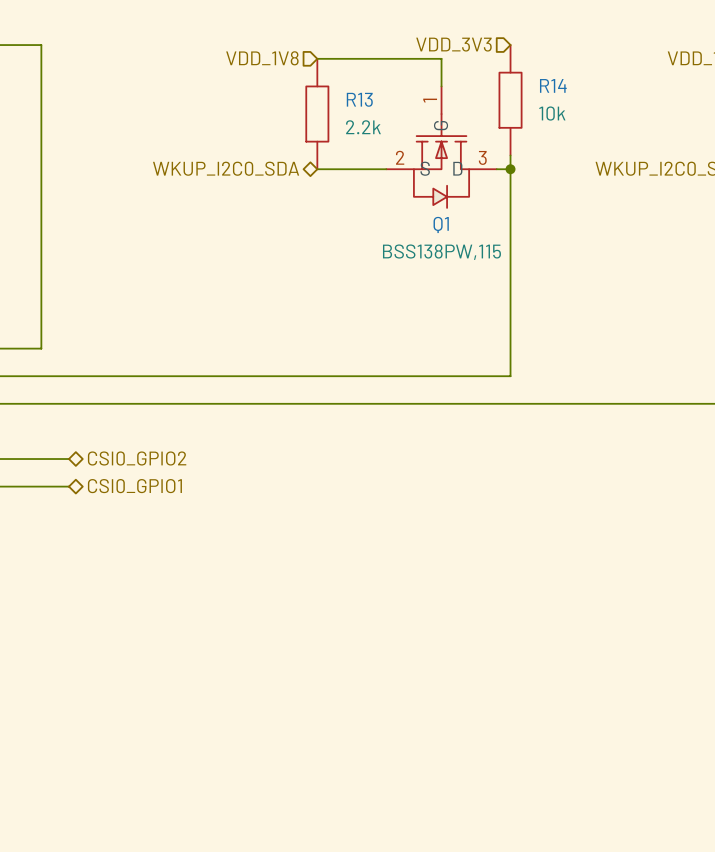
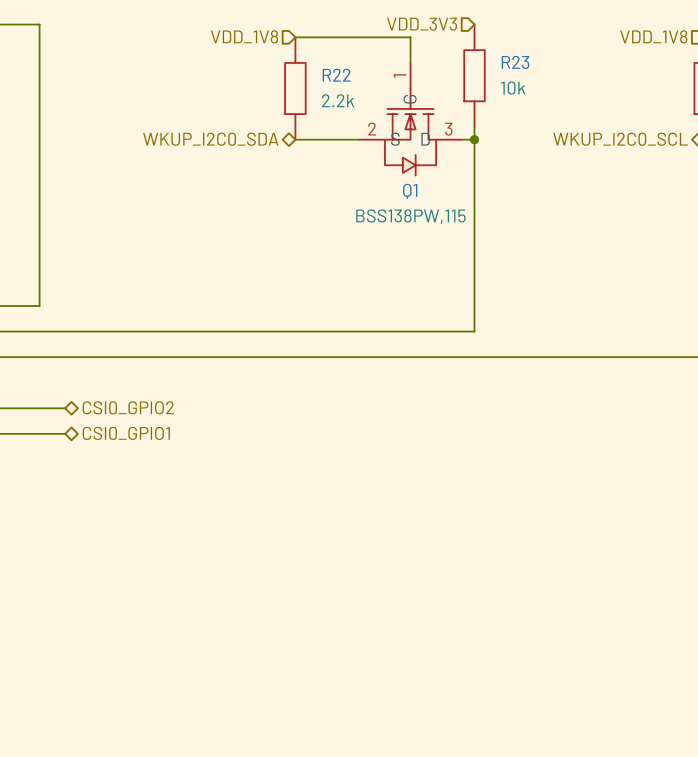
R14 name: R14 (553, 85) -> R23 (515, 62)
R13 name: R13 (359, 99) -> R22 (336, 75)

